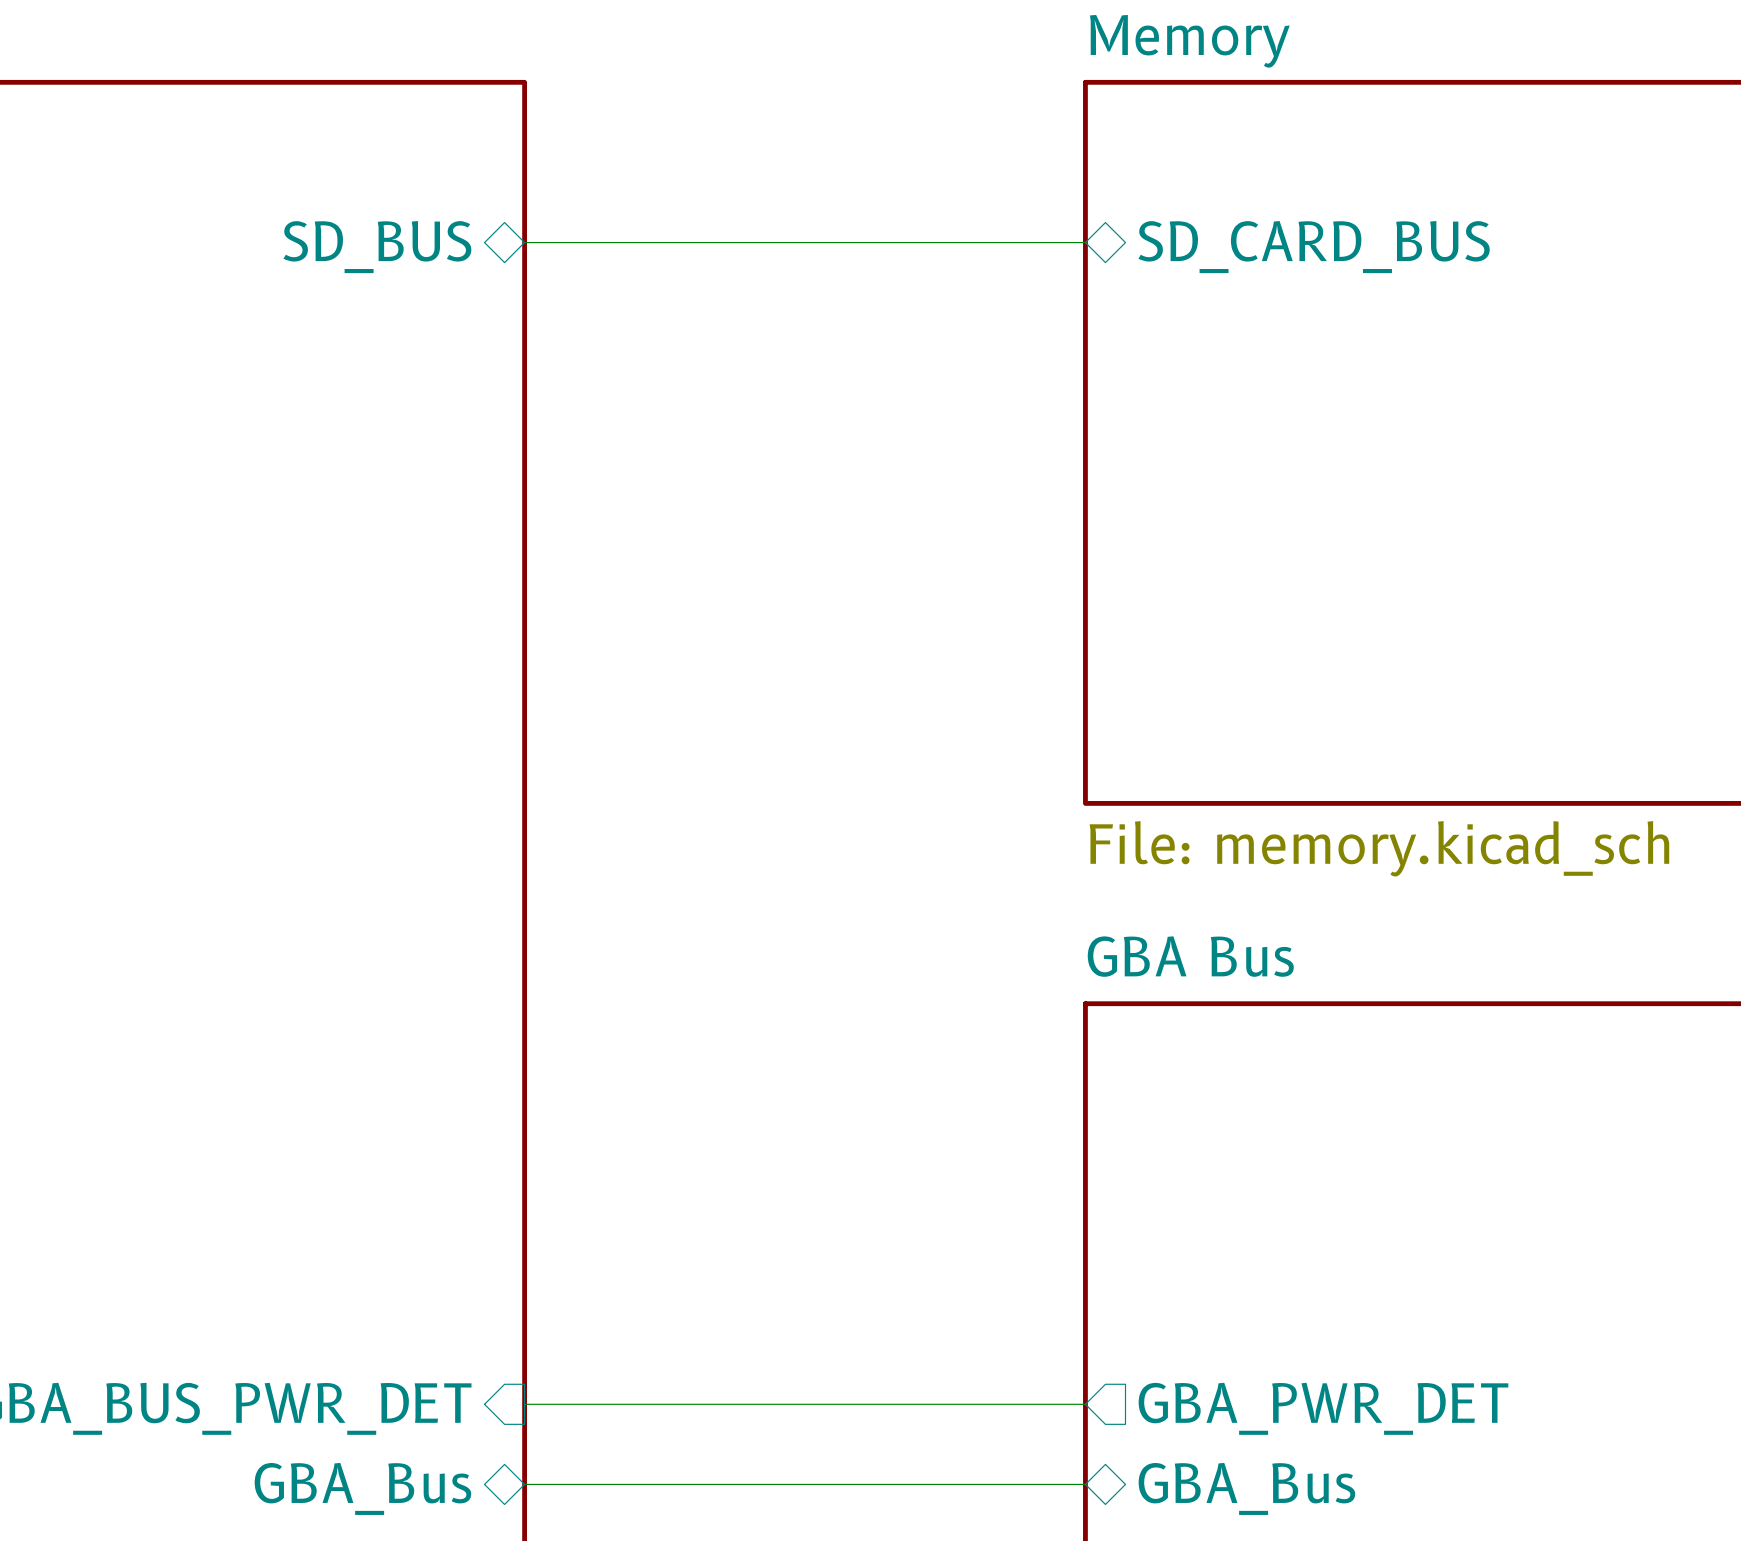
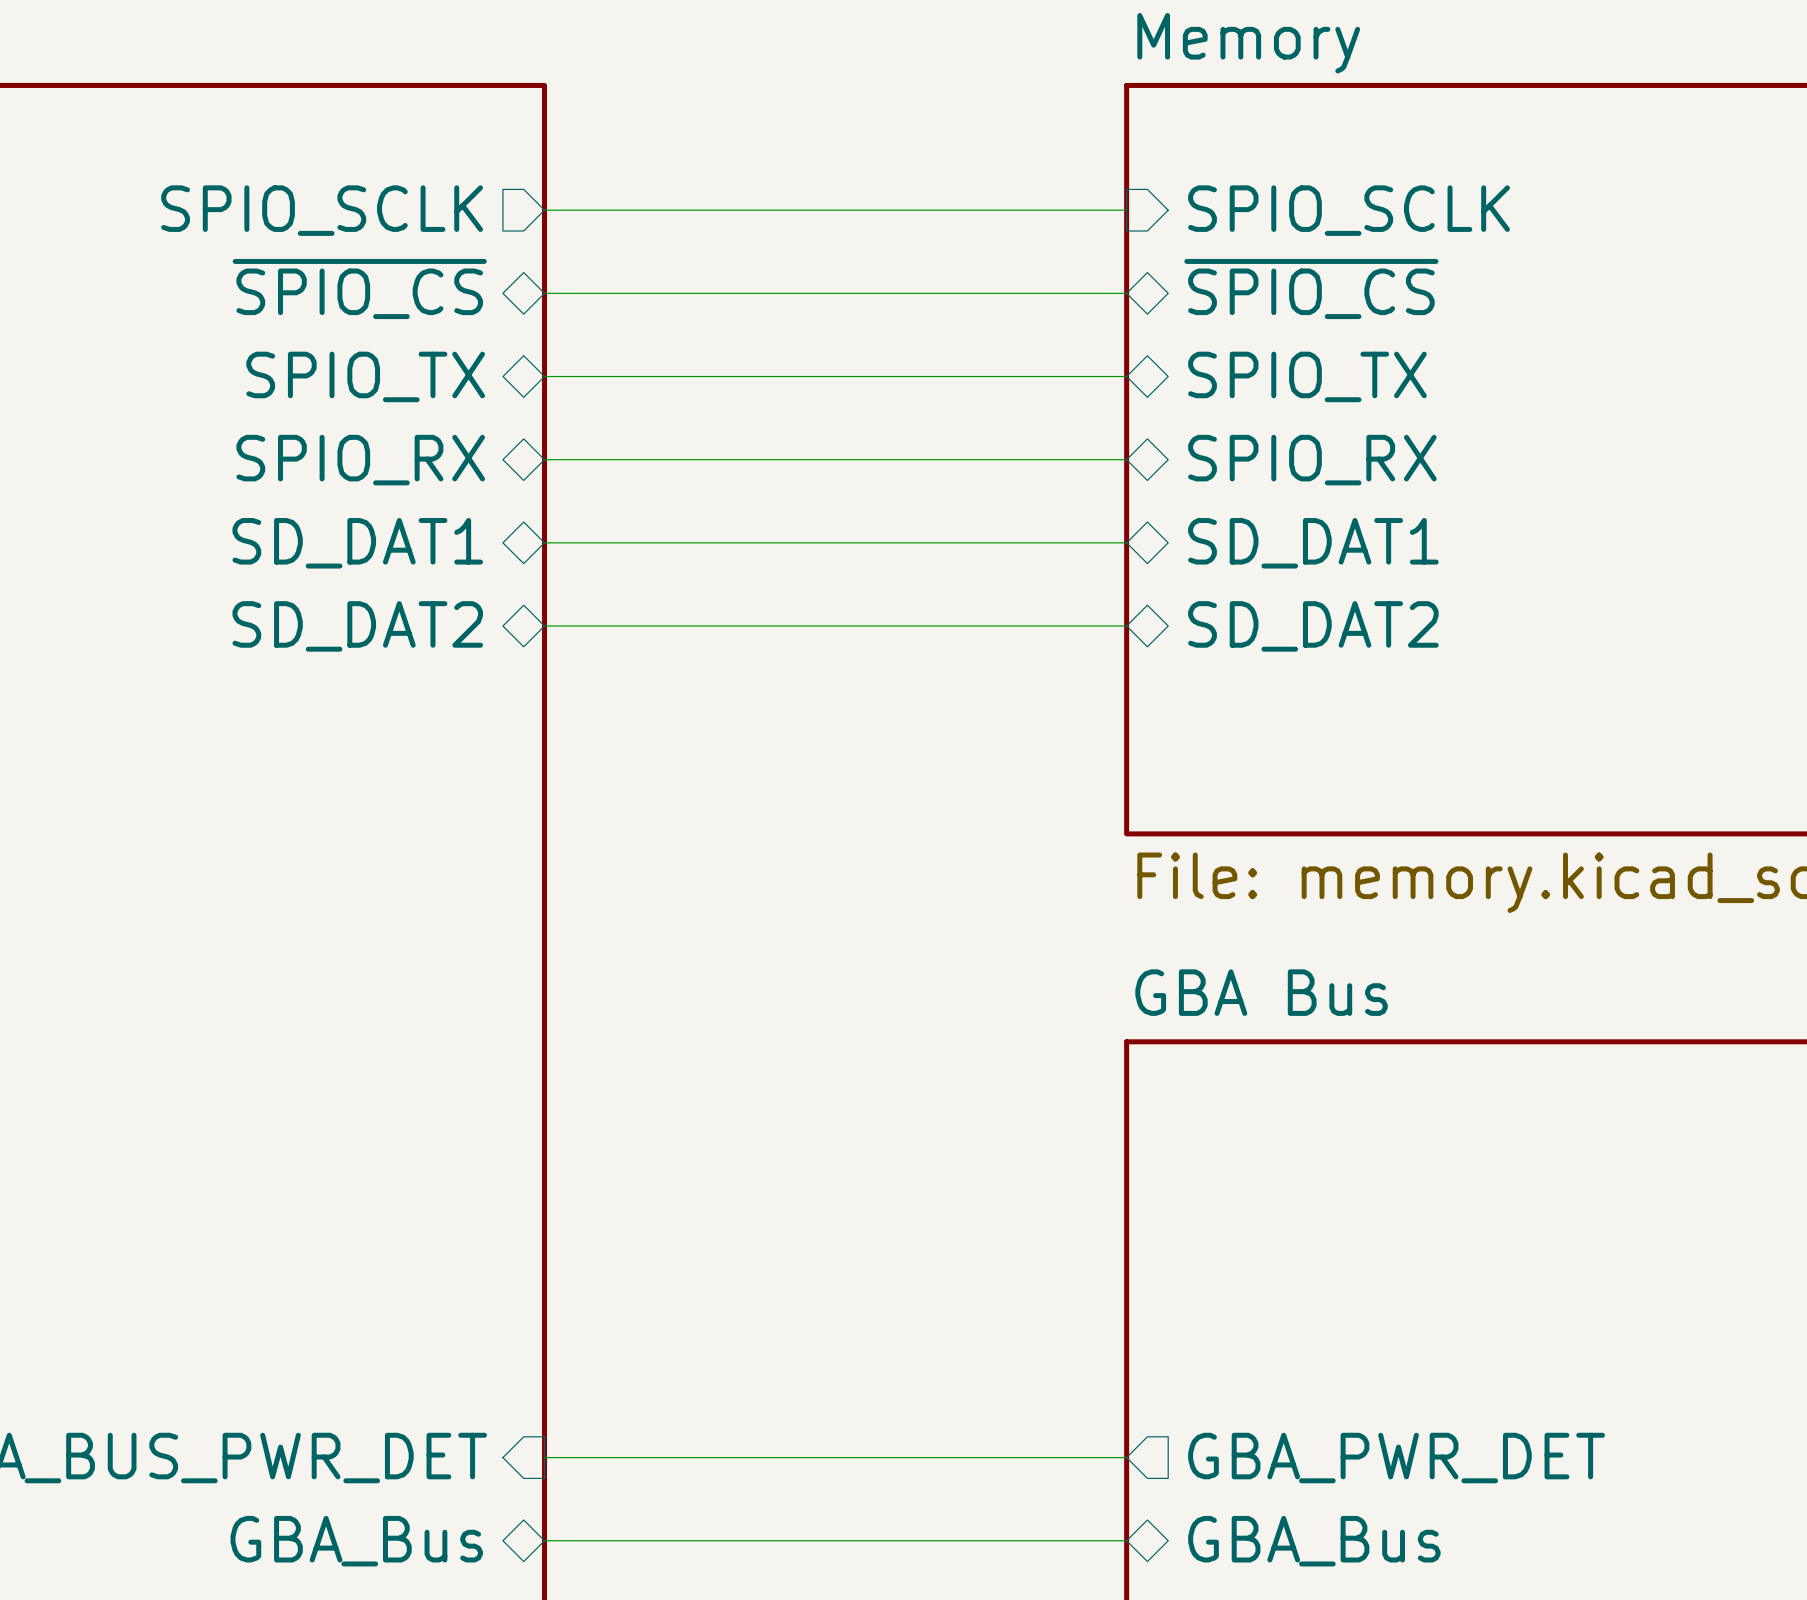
sheet pin: none -> SPIO_SCLK (322, 210)
sheet pin: none -> SPIO_SCLK (1349, 210)
wire: (524, 242) (1085, 242) -> (544, 210) (1126, 210)
sheet pin: SD_BUS (377, 247) -> none
sheet pin: SD_CARD_BUS (1314, 247) -> none
sheet pin: none -> ~{SPIO_CS} (359, 289)
wire: none -> (544, 293) (1126, 293)
sheet pin: none -> ~{SPIO_CS} (1311, 289)
wire: none -> (544, 376) (1126, 376)
sheet pin: none -> SPIO_TX (365, 376)
sheet pin: none -> SPIO_TX (1307, 376)
wire: none -> (544, 459) (1126, 459)
sheet pin: none -> SPIO_RX (360, 460)
sheet pin: none -> SPIO_RX (1312, 460)
wire: none -> (544, 542) (1126, 542)
sheet pin: none -> SD_DAT1 (357, 543)
sheet pin: none -> SD_DAT1 (1313, 543)
wire: none -> (544, 626) (1126, 626)
sheet pin: none -> SD_DAT2 (357, 626)
sheet pin: none -> SD_DAT2 (1313, 626)

